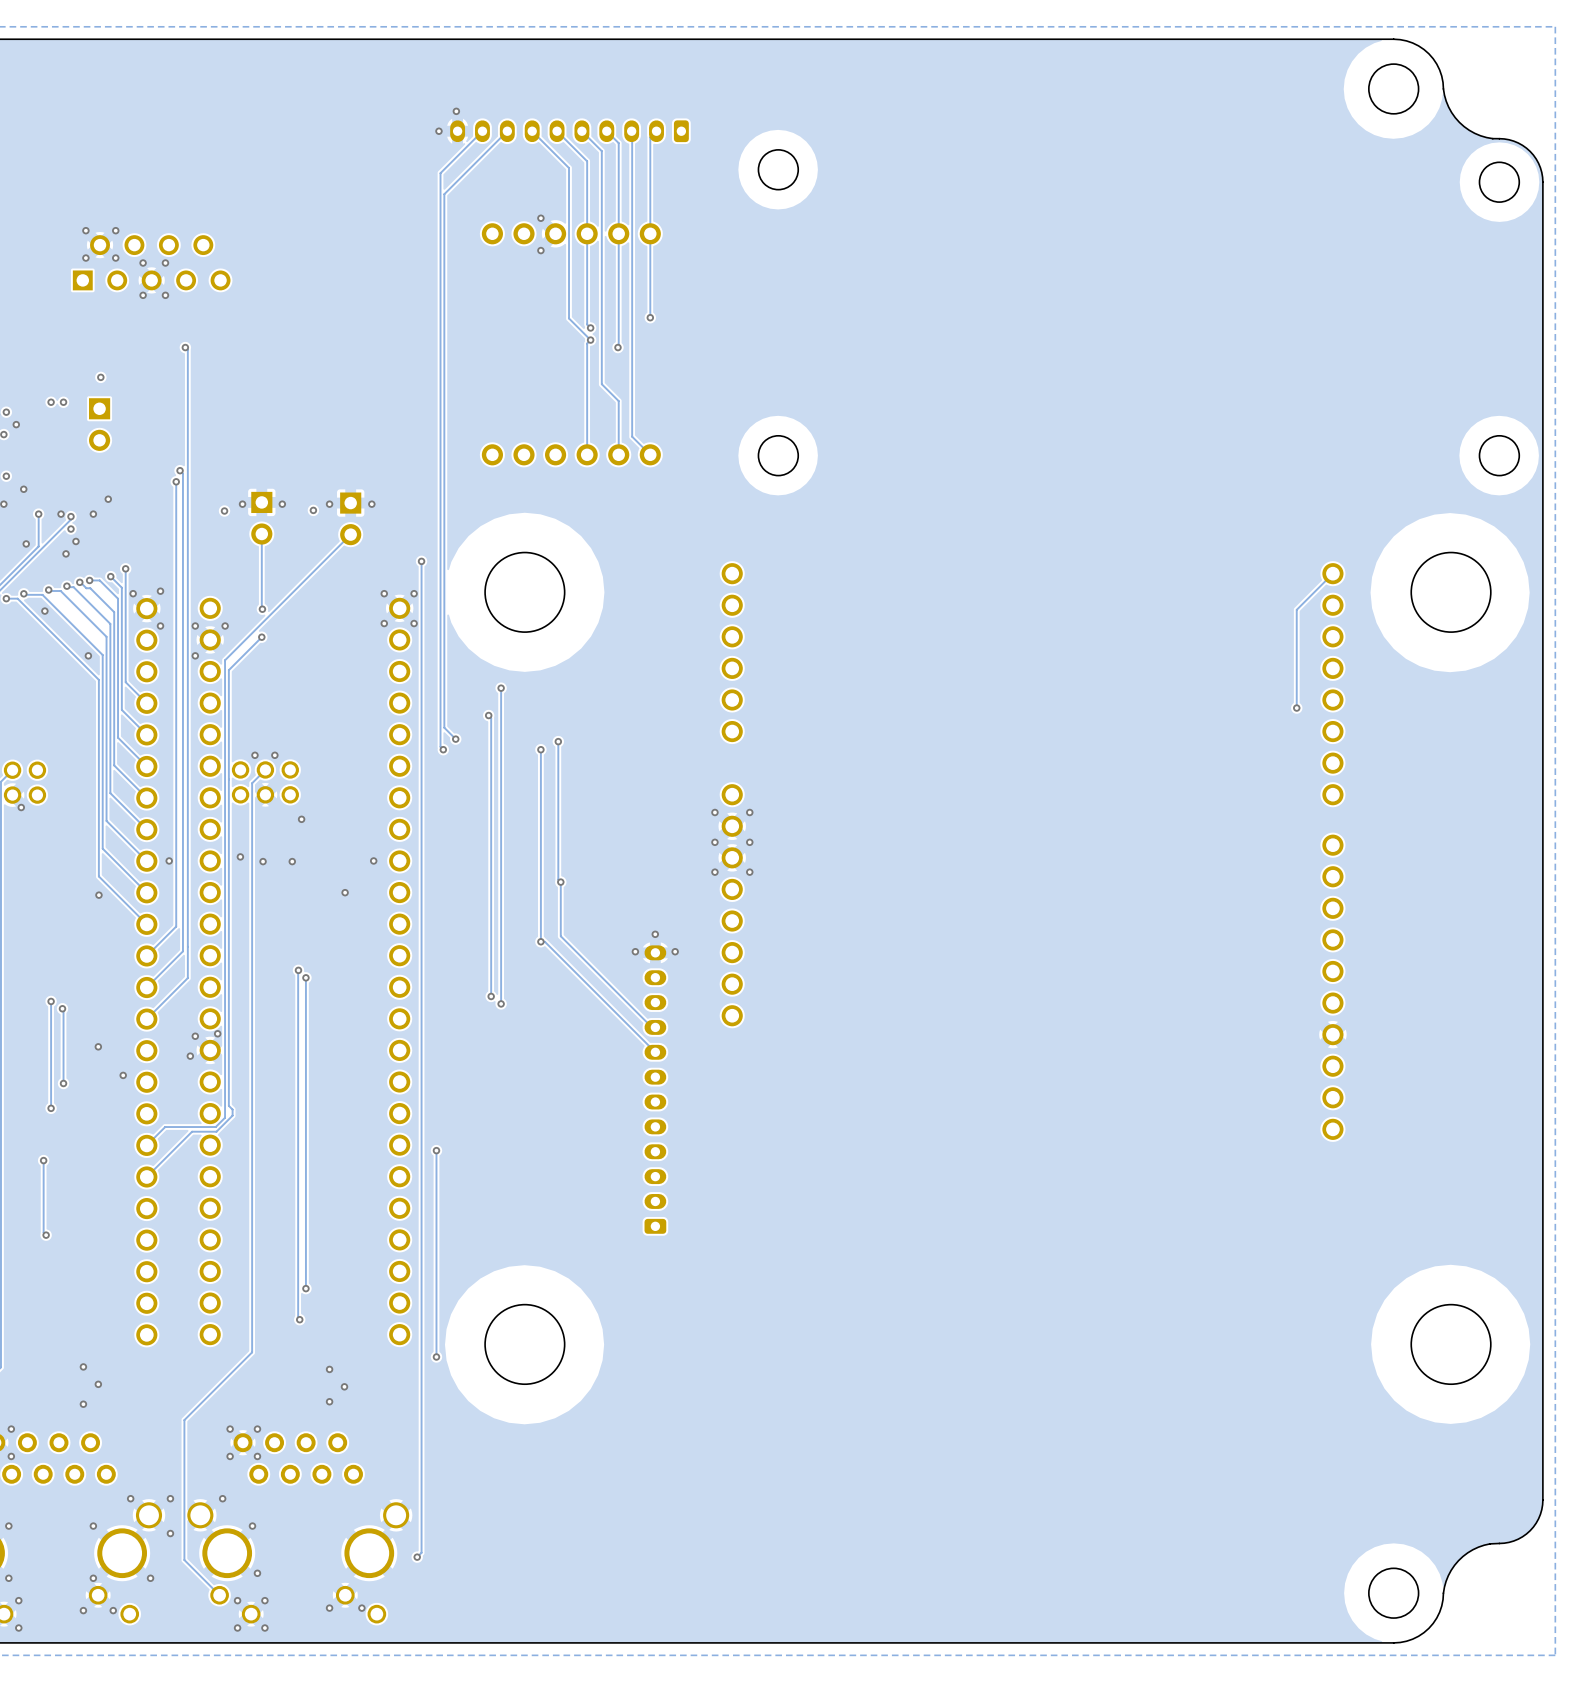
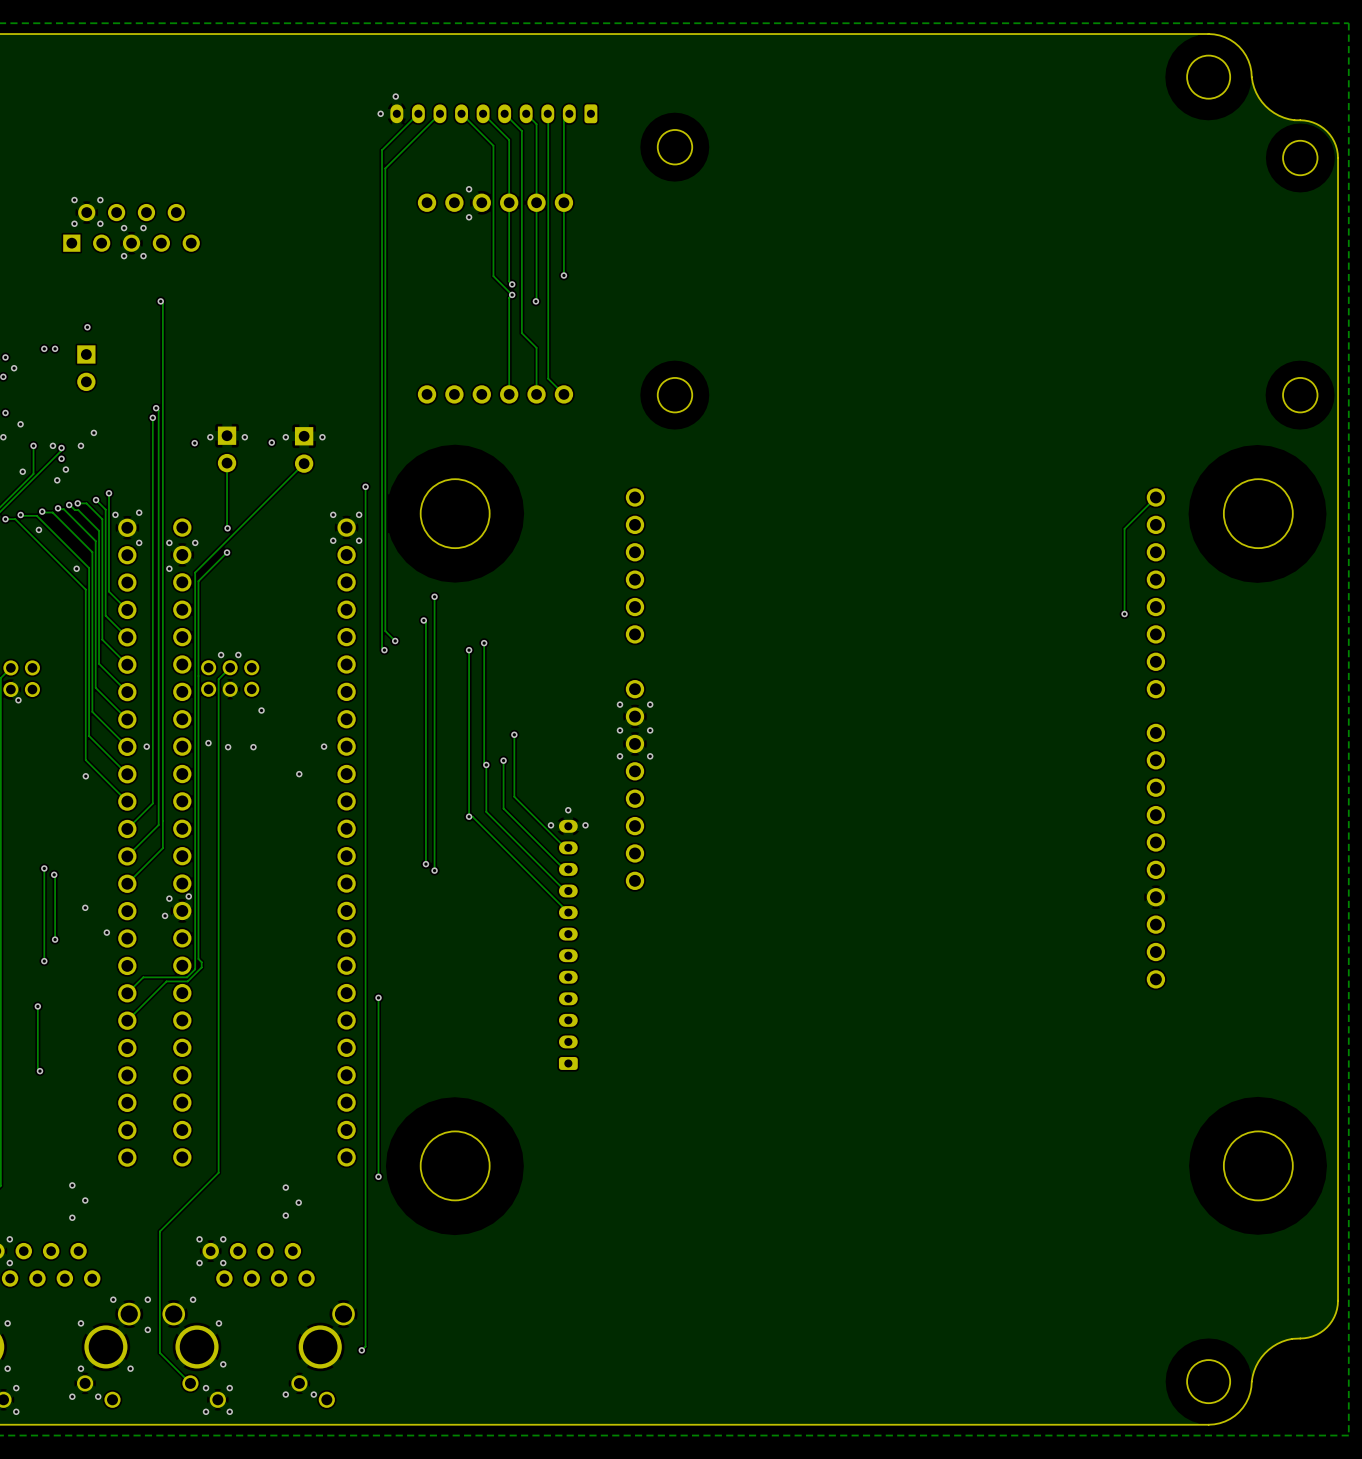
track: none -> (514, 734) (514, 796) (565, 847)
via: none -> (514, 734)
track: none -> (503, 760) (503, 808) (564, 869)
via: none -> (503, 760)
track: (298, 970) (298, 1318) (299, 1319) -> none
via: (298, 970) -> none
track: (305, 977) (305, 1288) -> none
via: (305, 977) -> none
via: (305, 1288) -> none
via: (299, 1319) -> none

